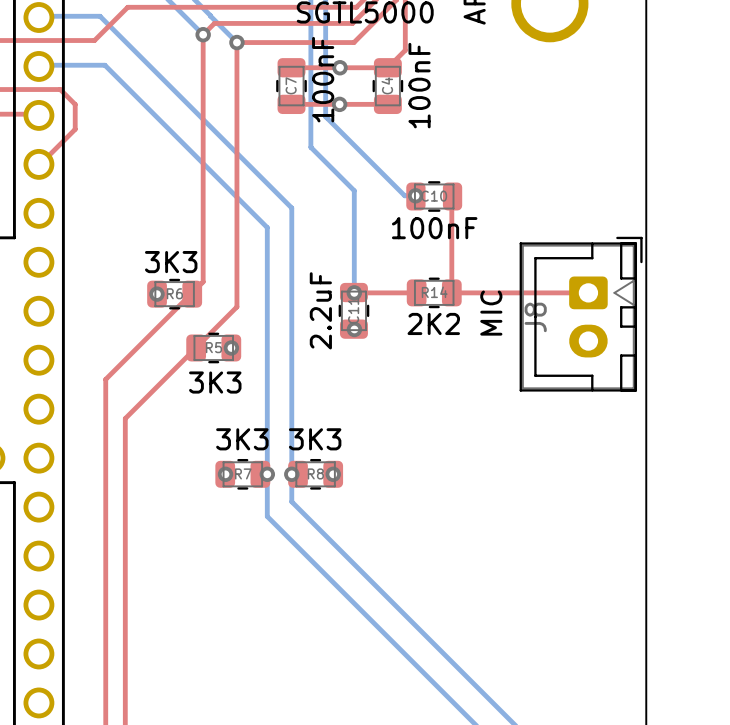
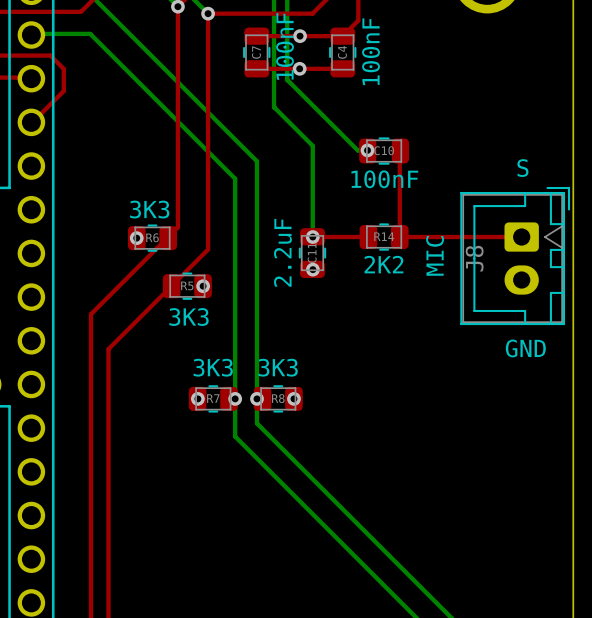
text: none -> S (522, 168)
text: none -> GND (525, 348)

